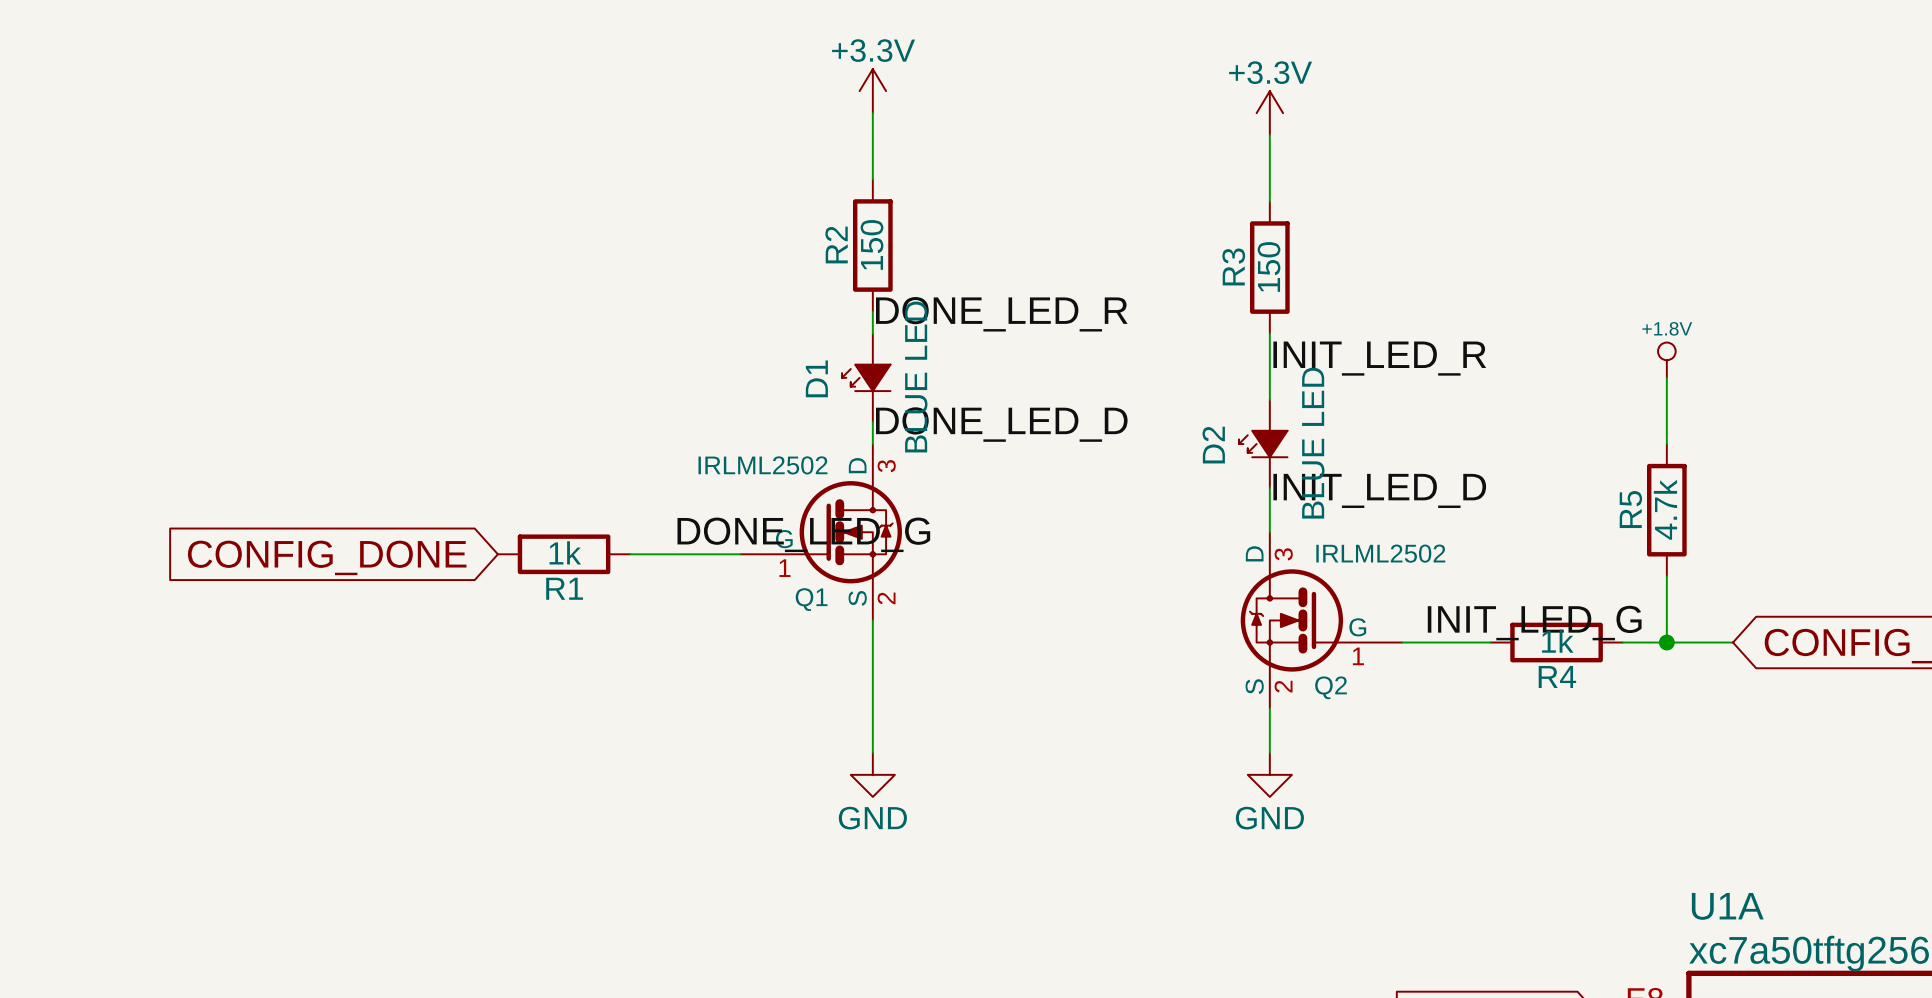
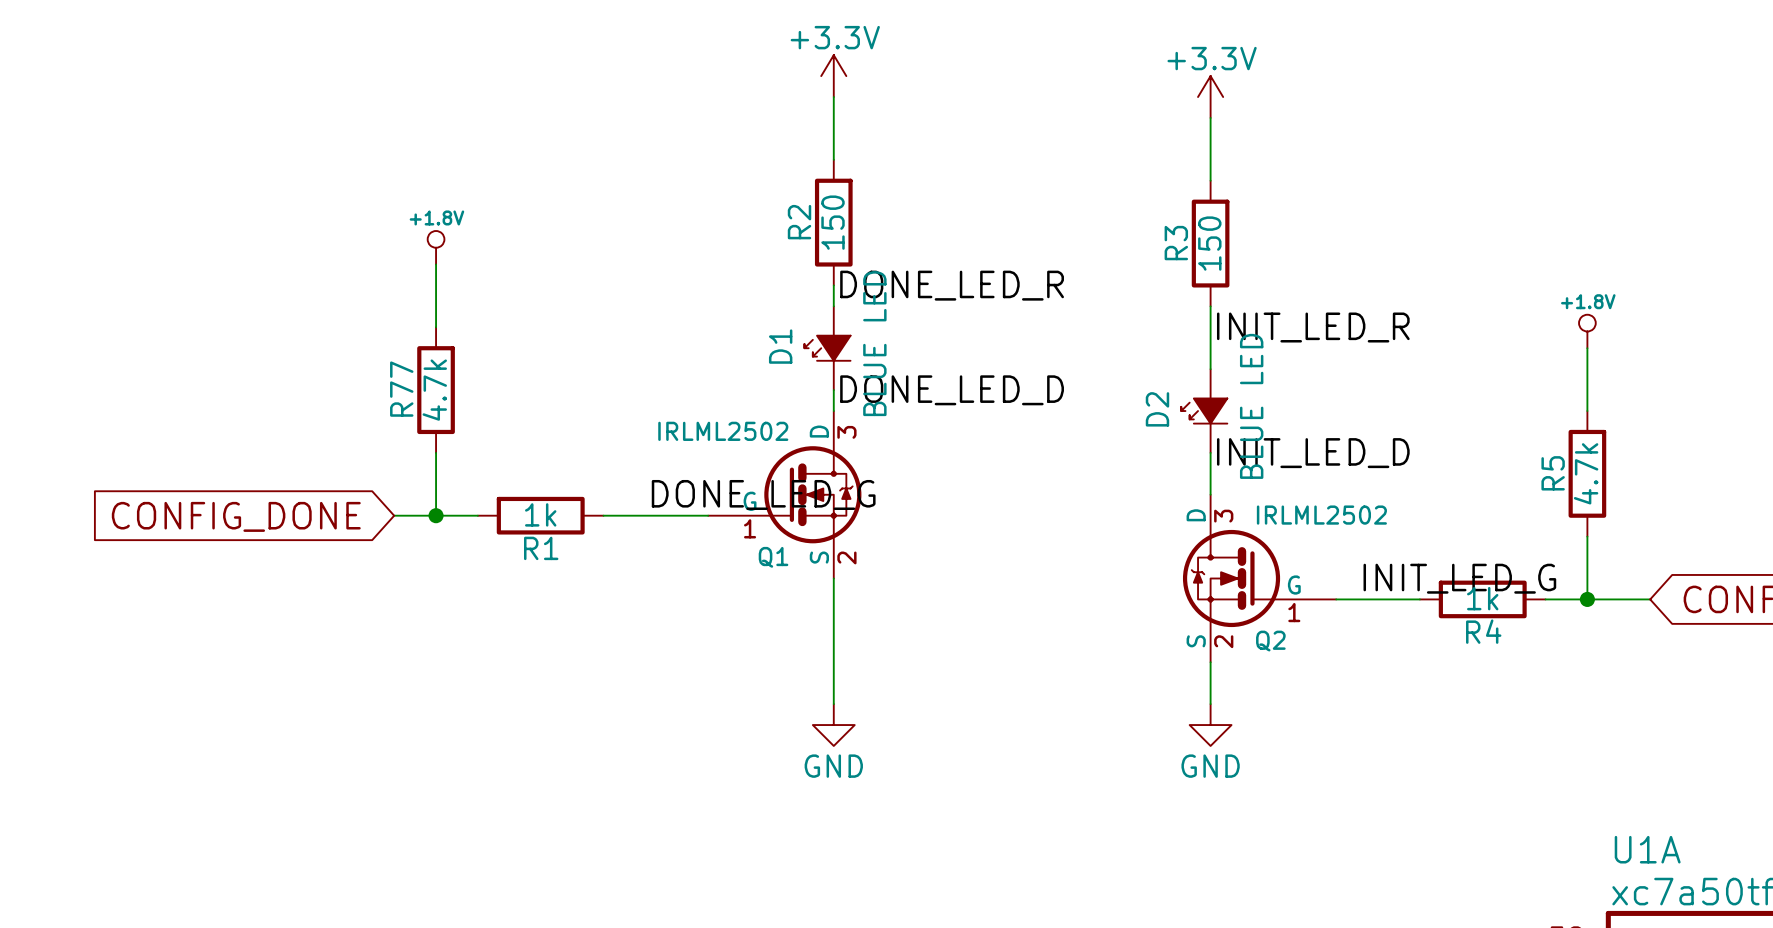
power symbol: none -> +1.8V (436, 247)
wire: none -> (436, 264) (436, 327)
R77: none -> 4.7k (436, 390)
wire: none -> (436, 452) (436, 515)
wire: none -> (394, 515) (477, 515)
junction: none -> (436, 515)
global label position: CONFIG_DONE (327, 557) -> CONFIG_DONE (236, 516)

